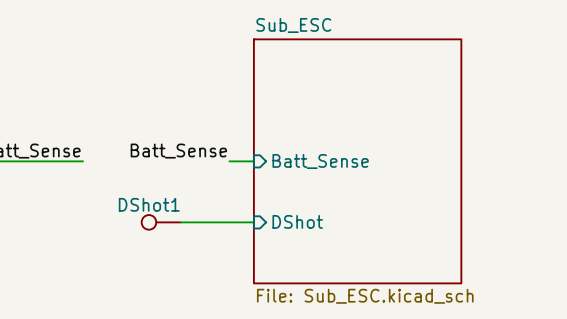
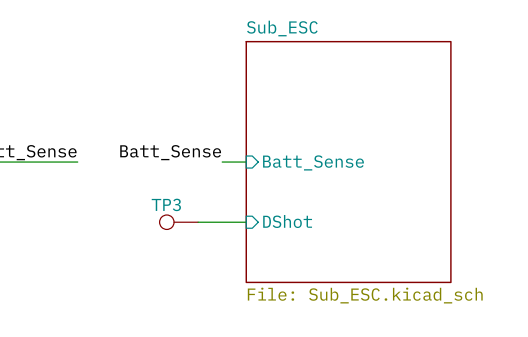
DShot1: (161, 222) -> none
TP3: none -> (178, 222)

